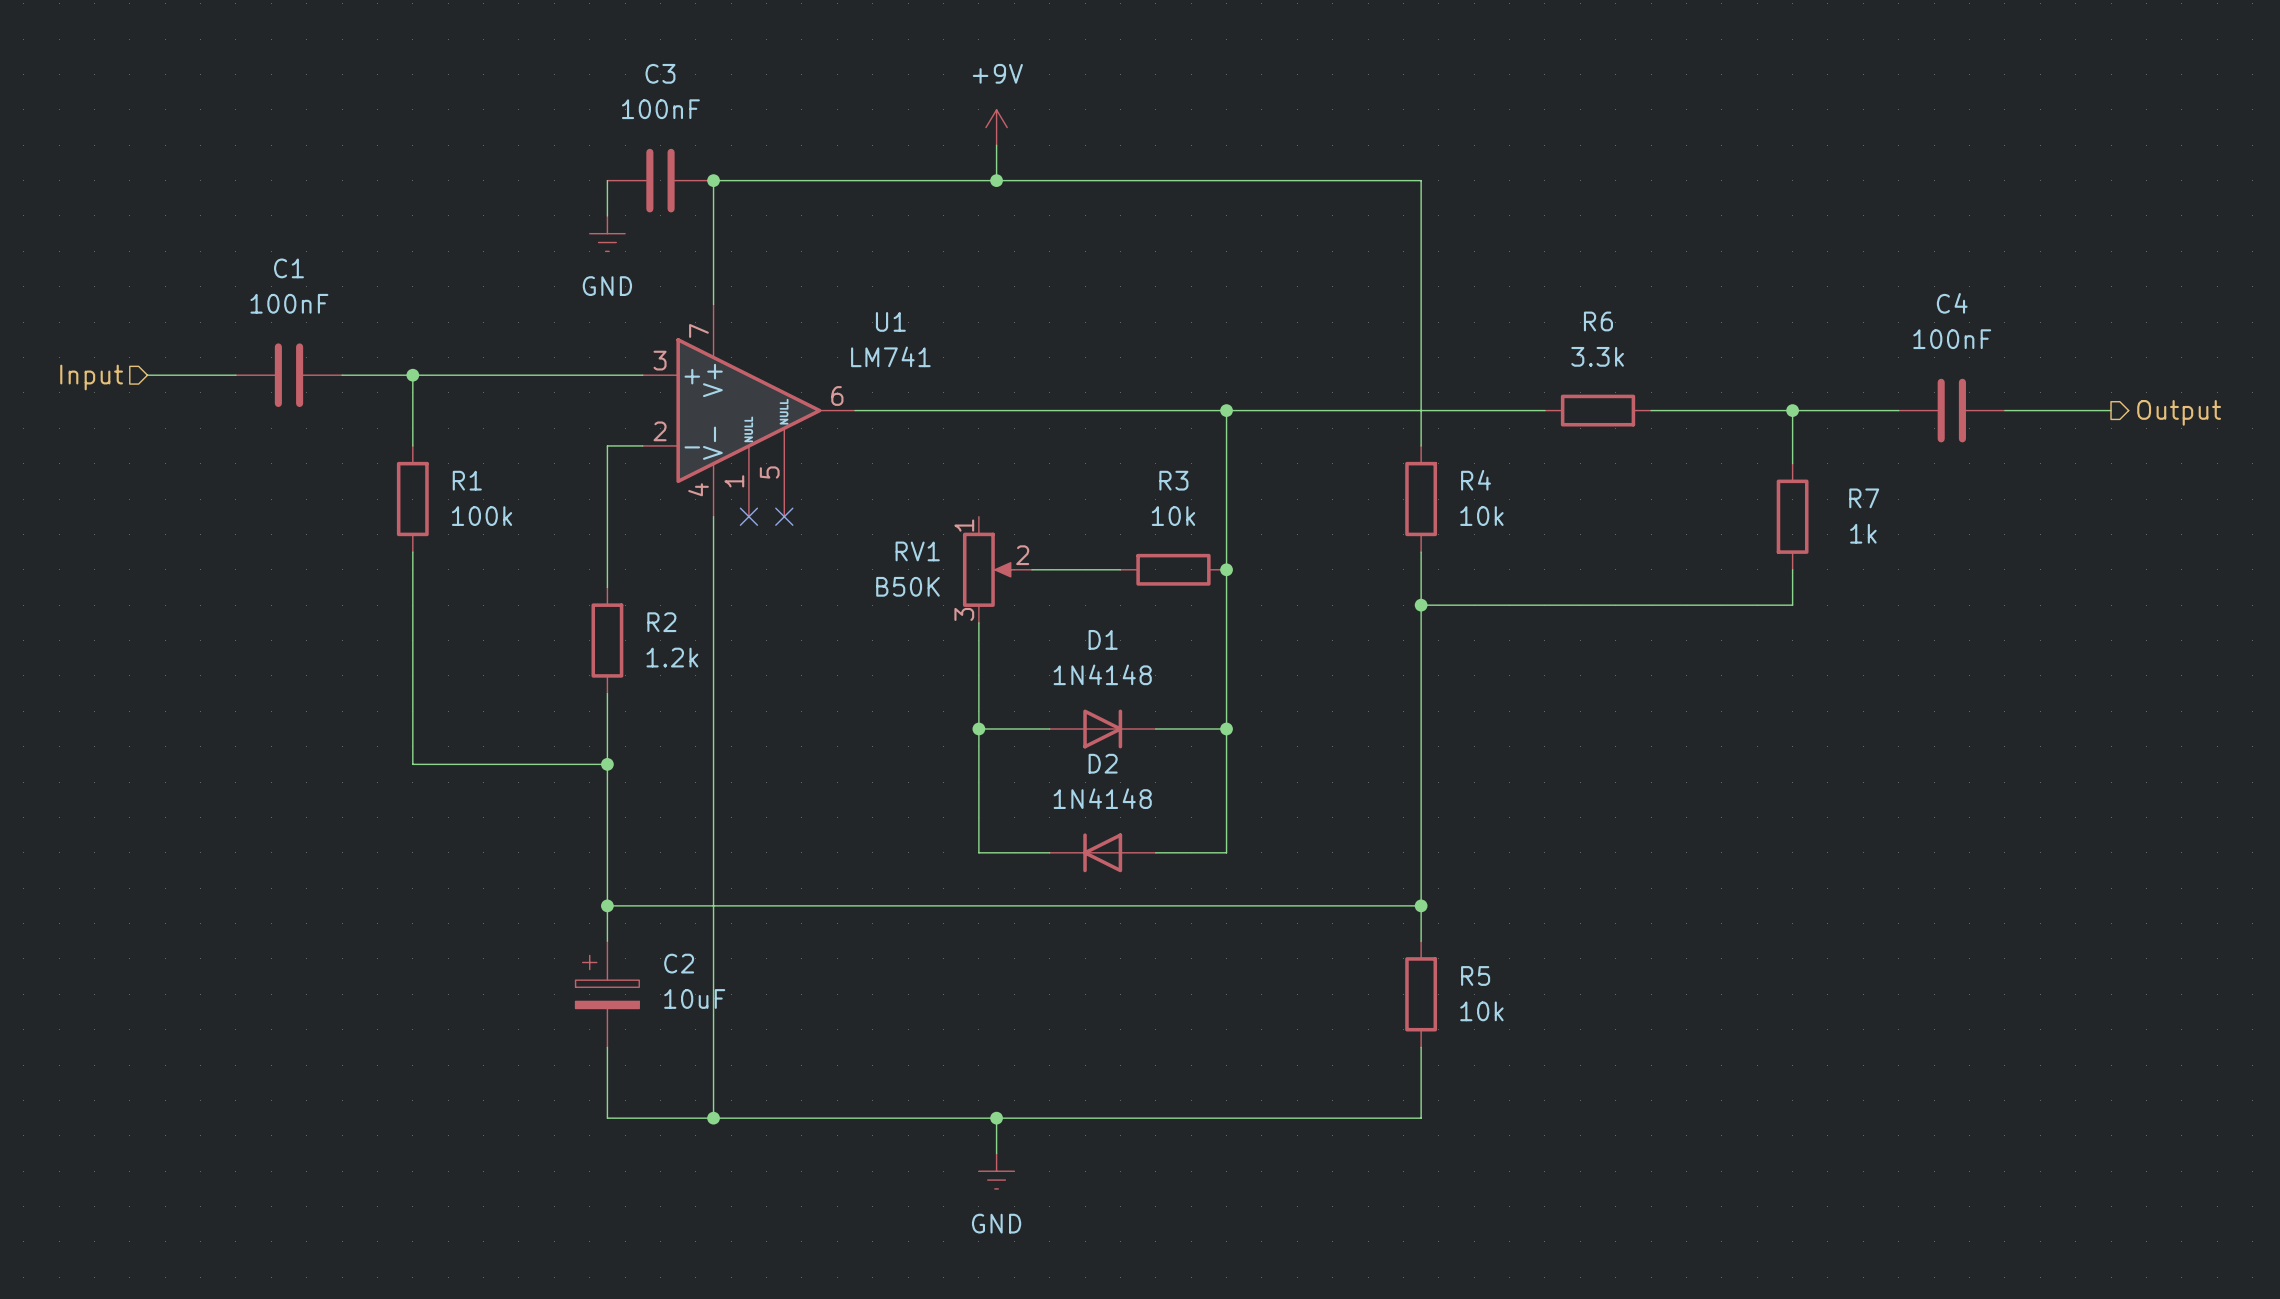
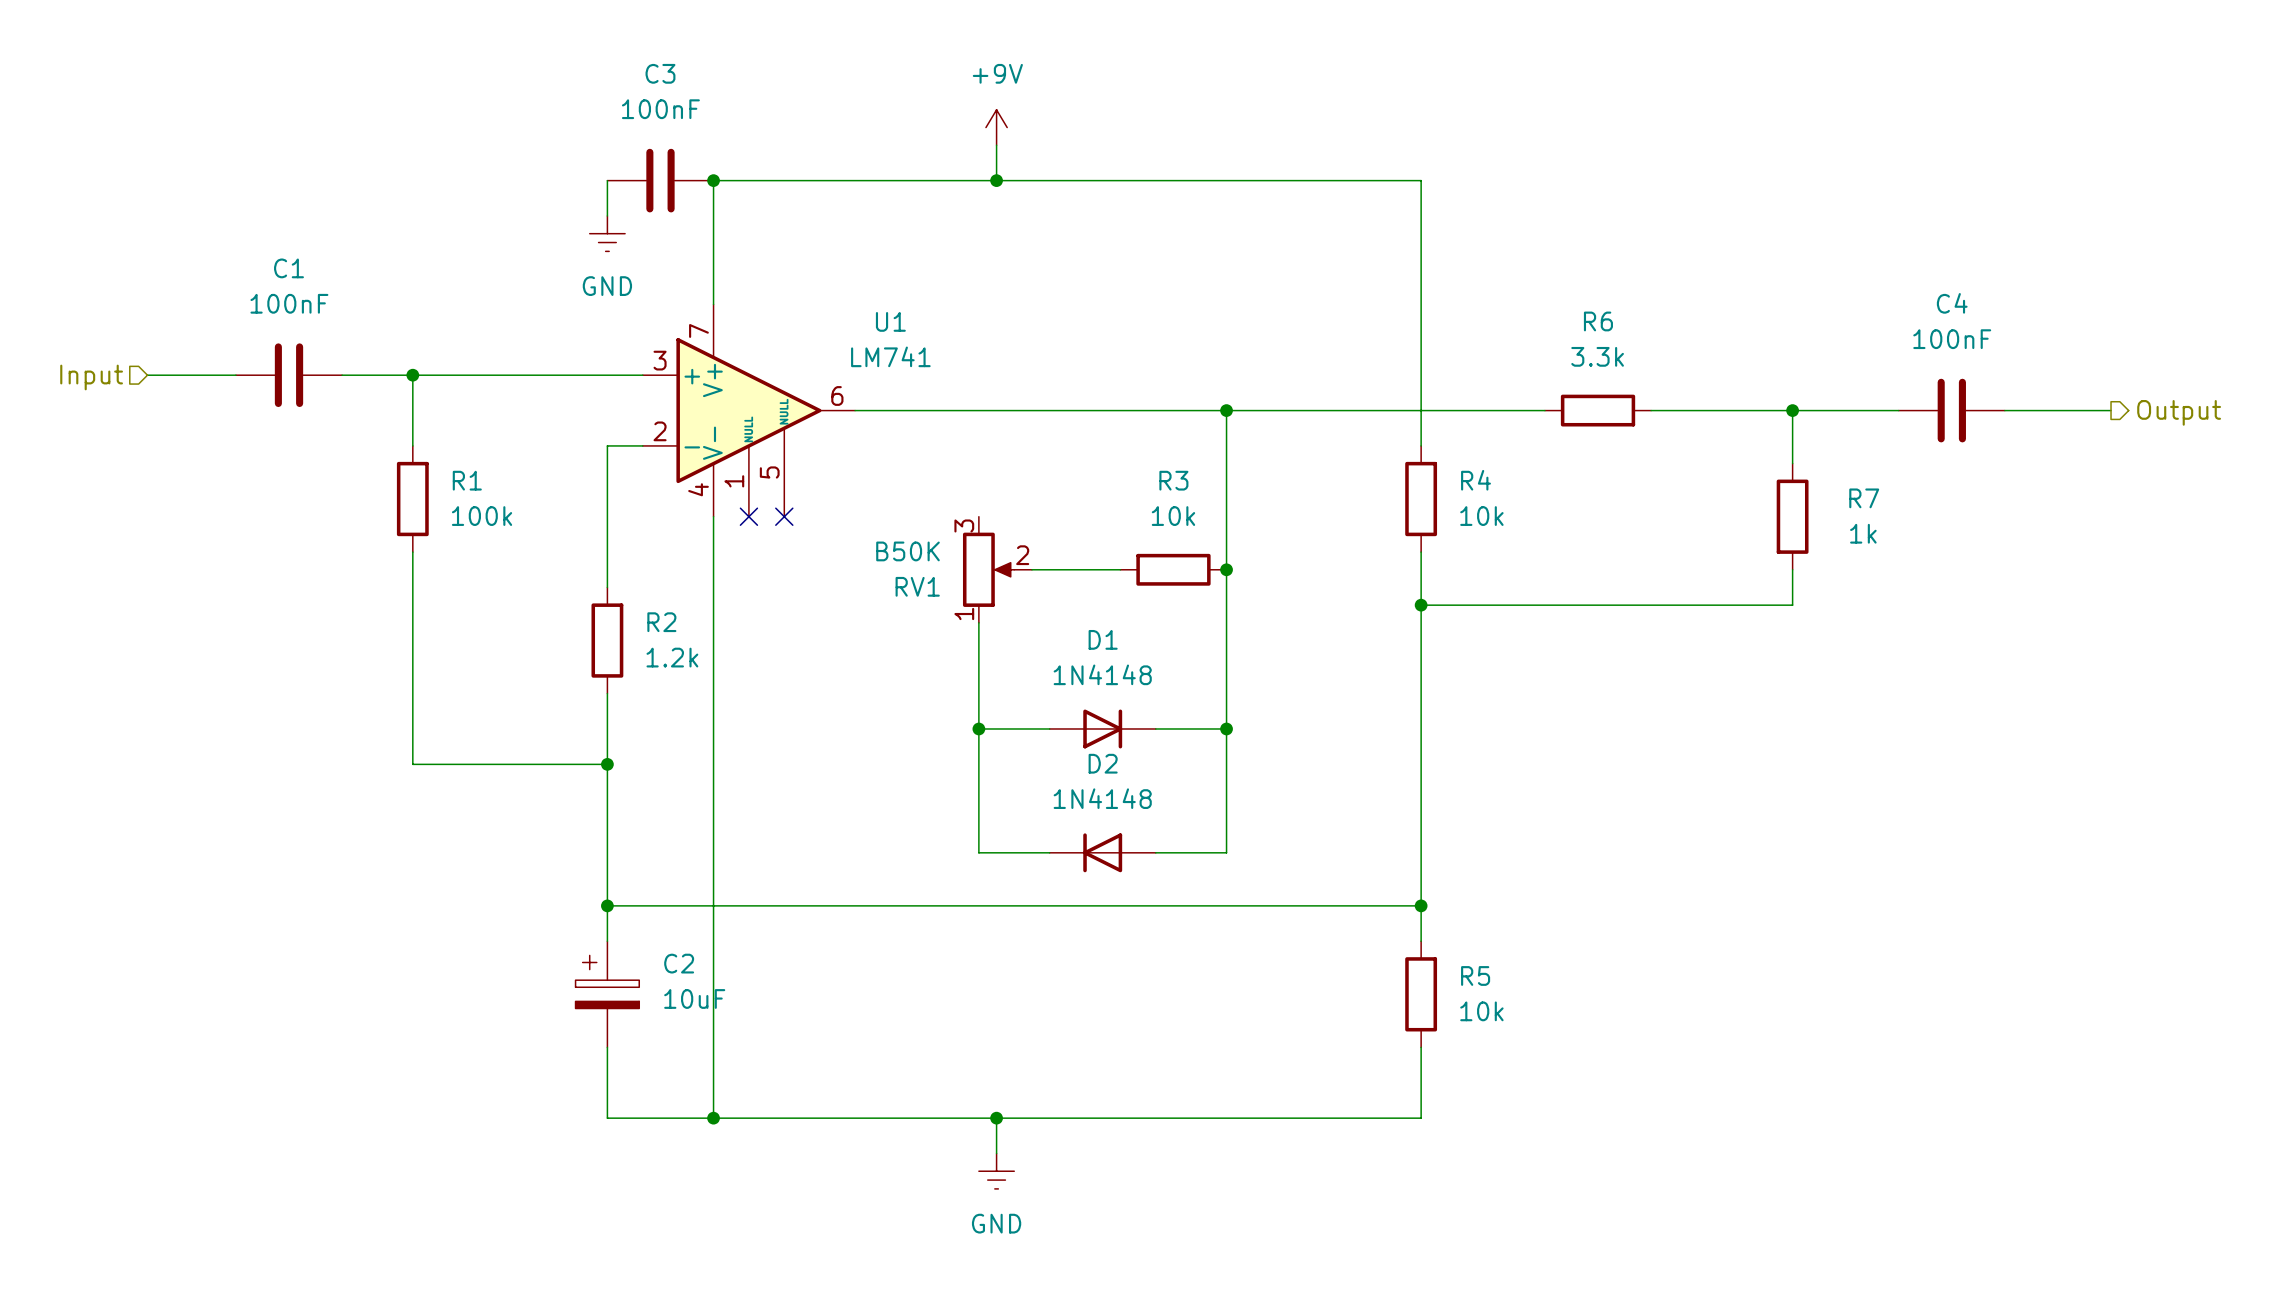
RV1 flip: as is (988, 569) -> up-down (988, 569)

